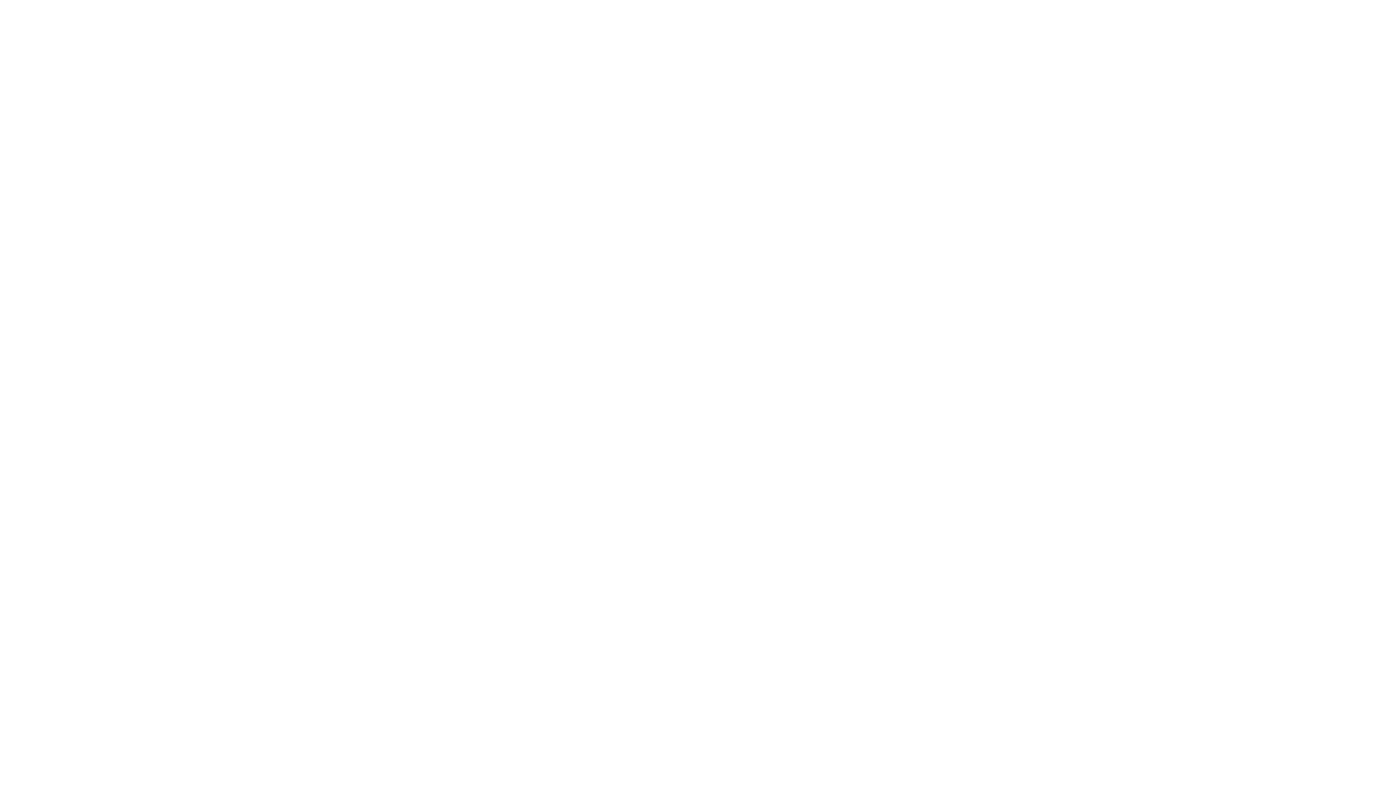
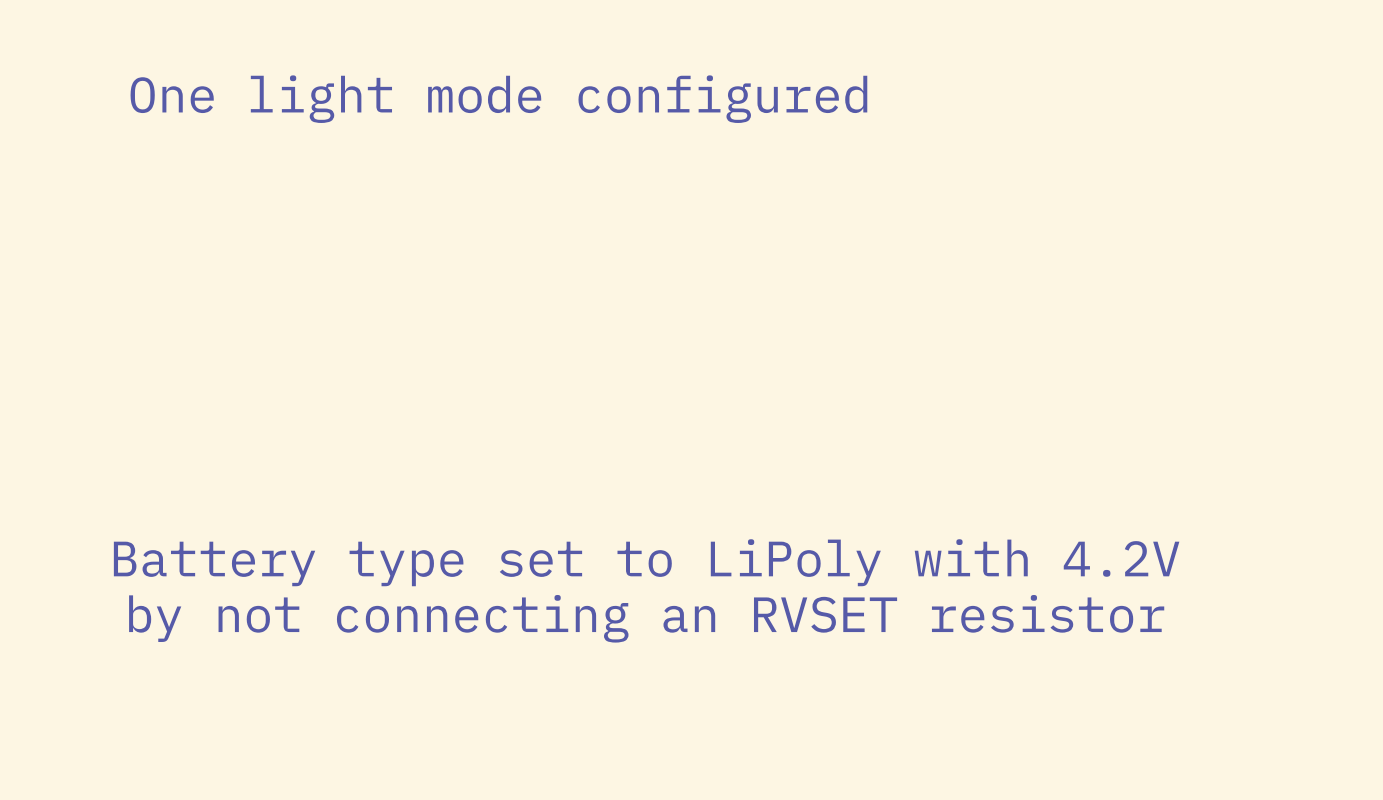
text: none -> One light mode configured (498, 99)
text: none -> Battery type set to LiPoly with 4.2V (646, 562)
text: none -> by not connecting an RVSET resistor (646, 618)

